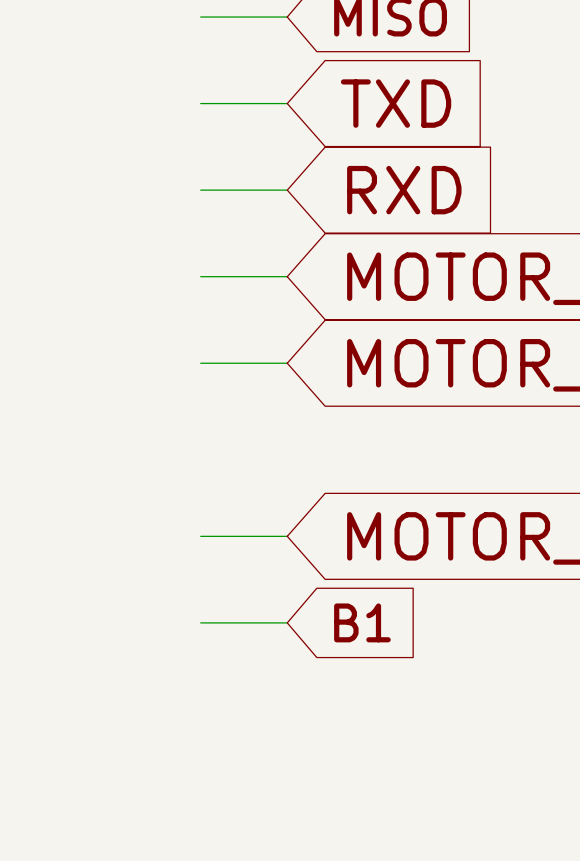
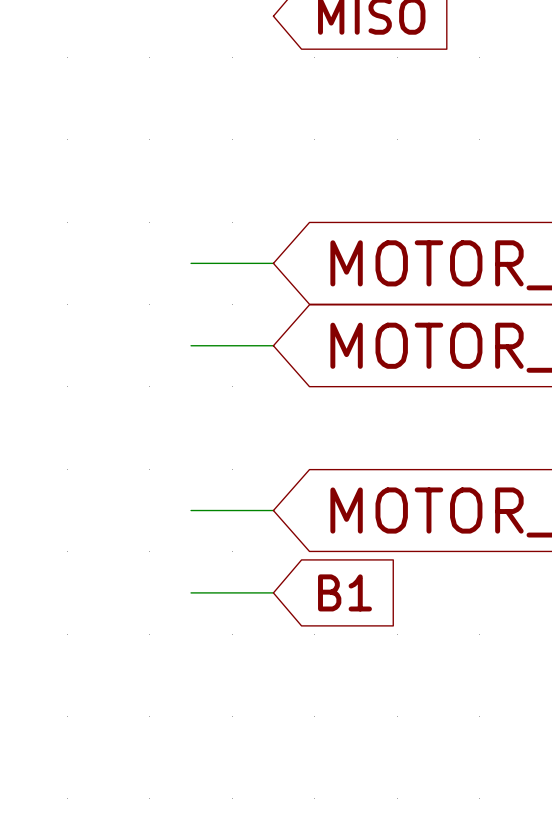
wire: (200, 17) (287, 17) -> none
wire: (200, 103) (287, 103) -> none
global label: TXD (396, 103) -> none
wire: (200, 190) (287, 190) -> none
global label: RXD (404, 190) -> none

